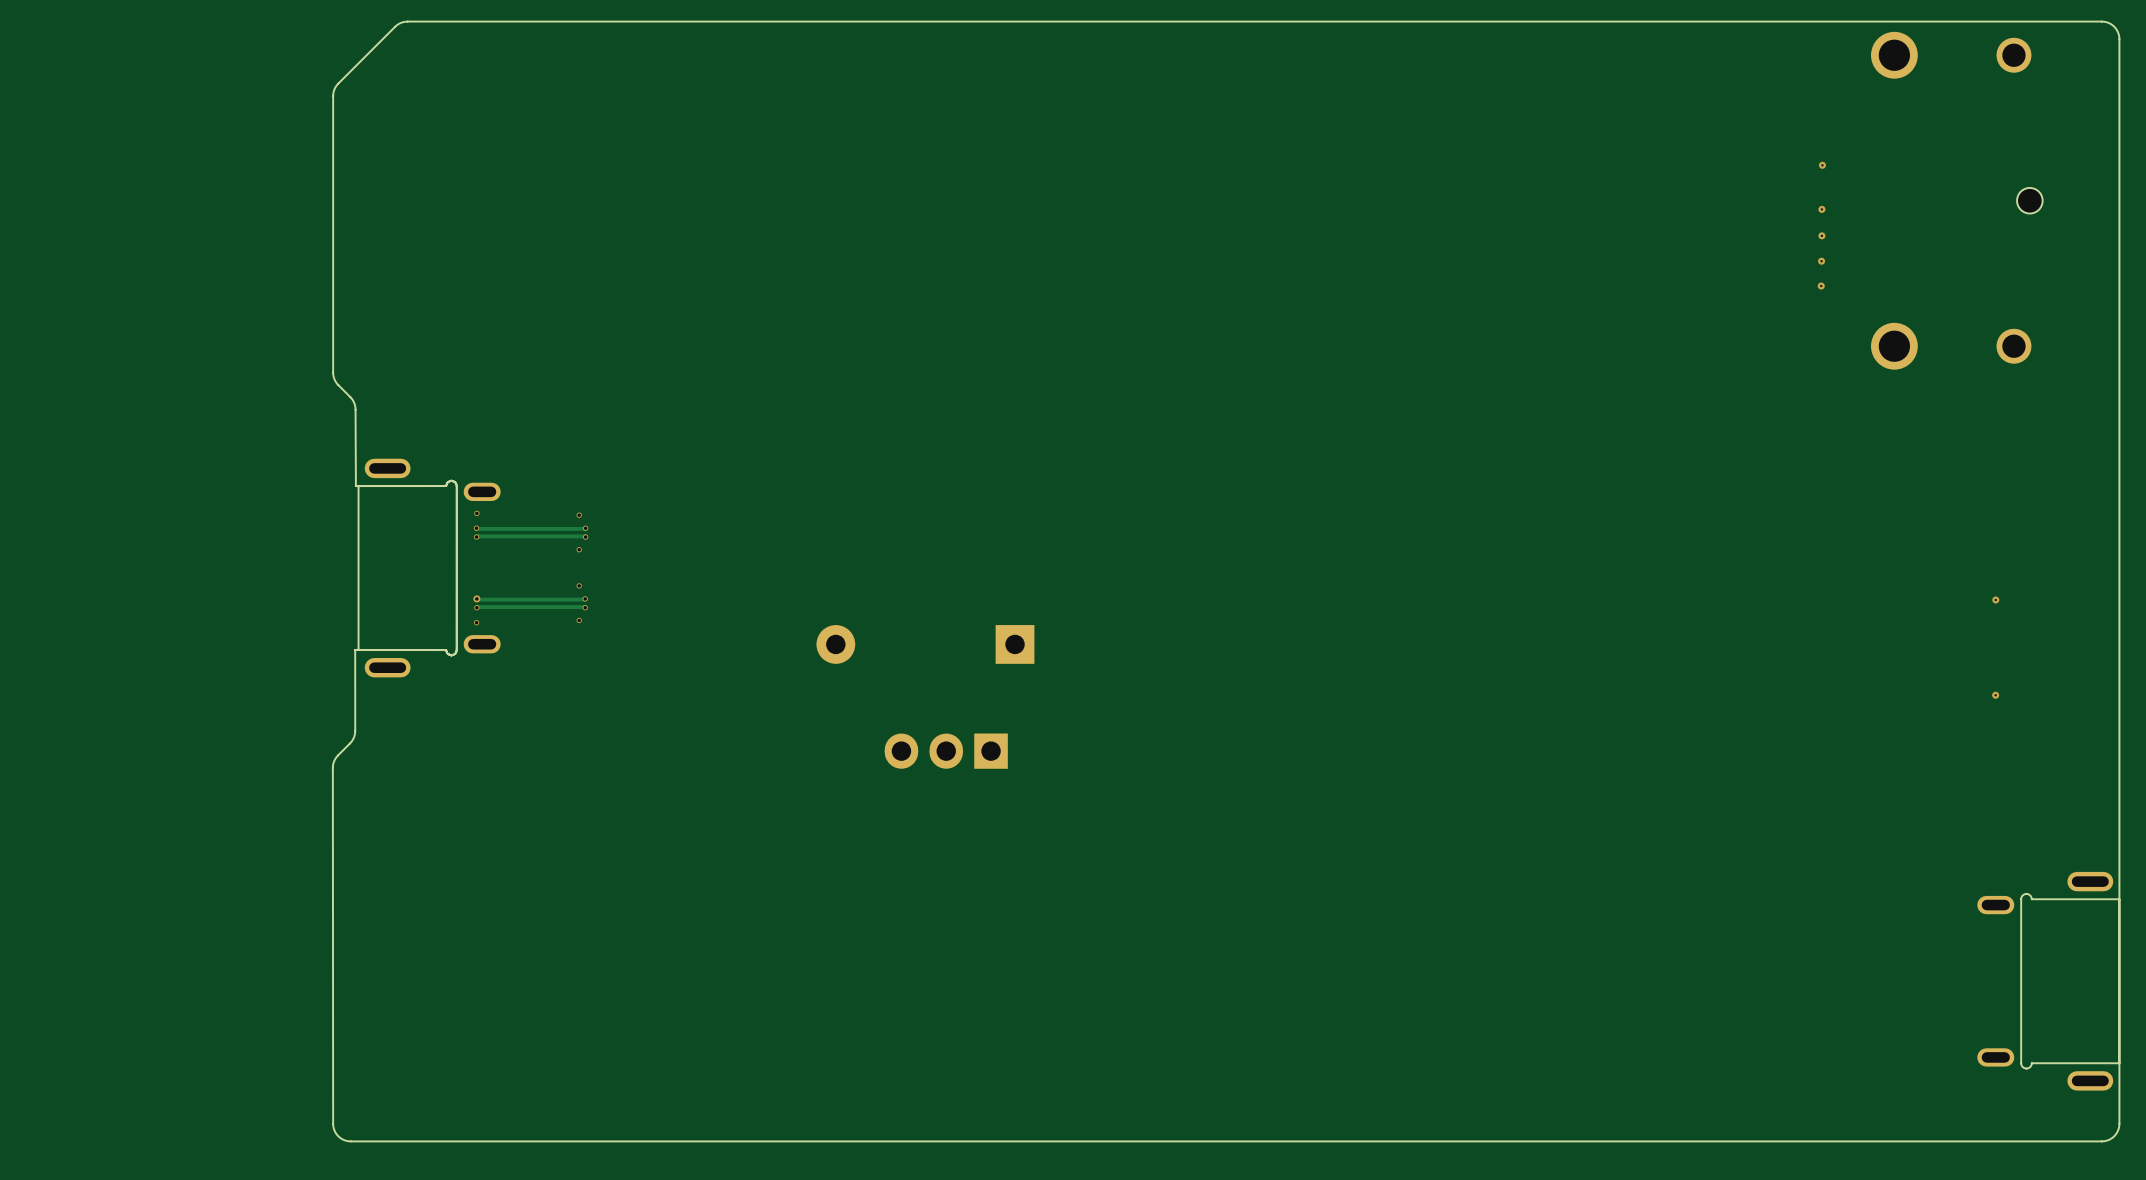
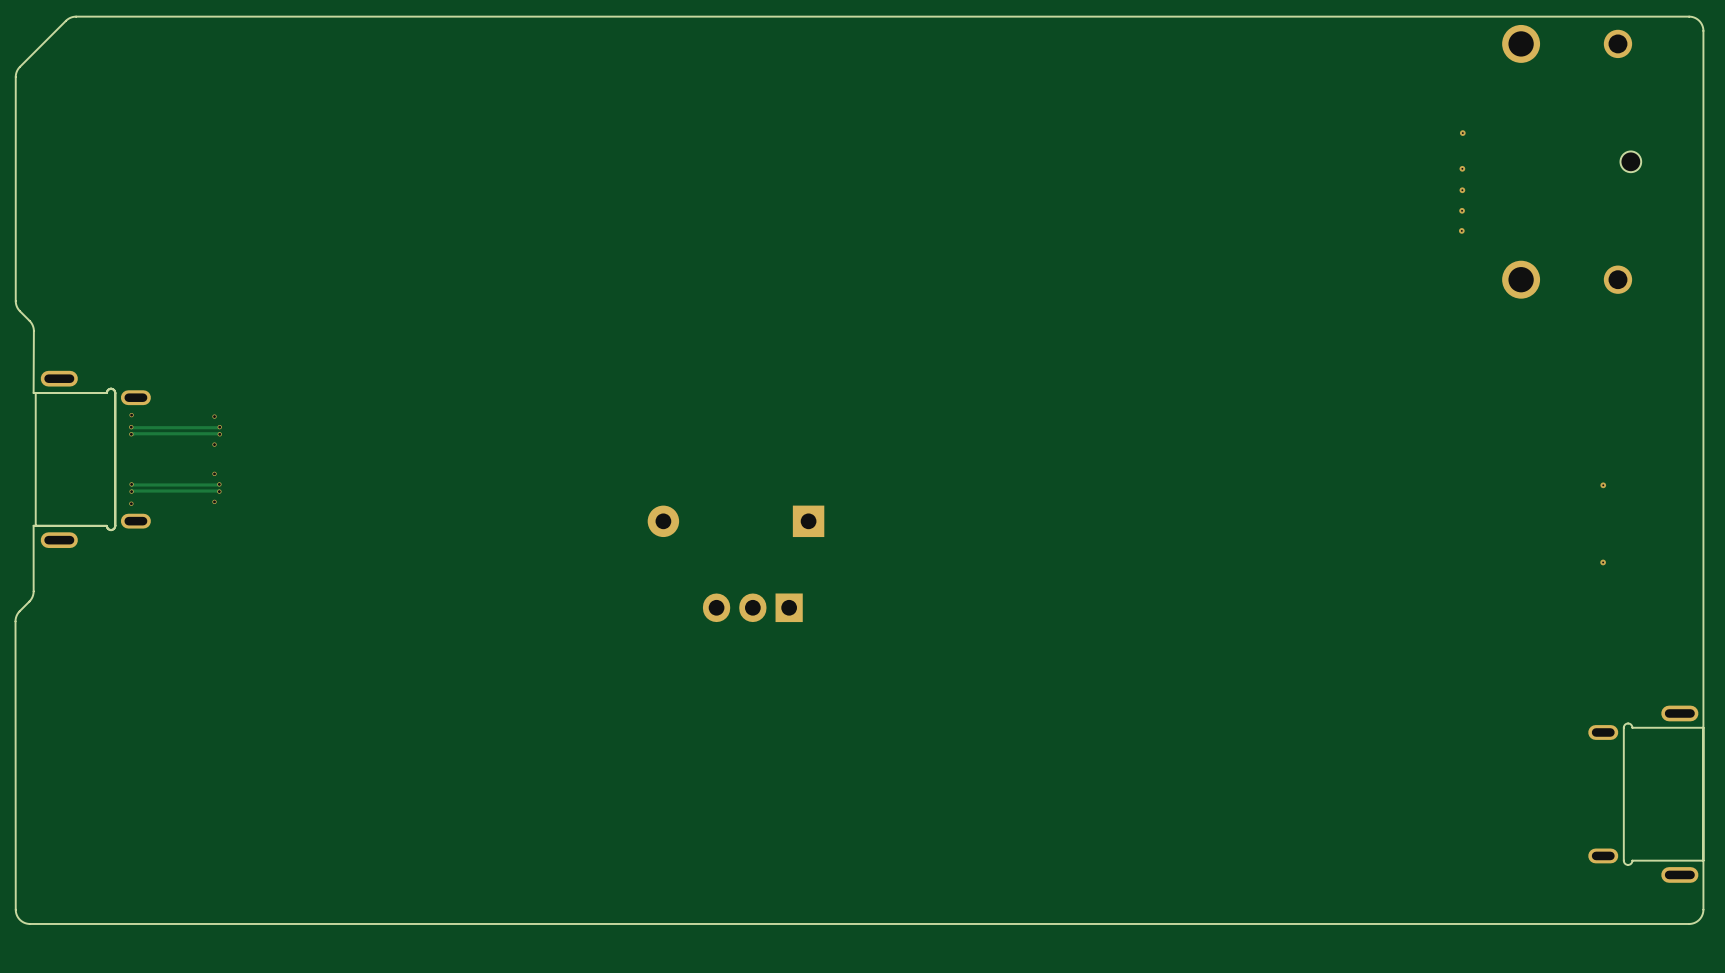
board edge: (407, 21) (395, 26) (338, 83) (333, 91) (333, 374) (336, 382) (351, 398) (355, 406) (355, 486) (446, 486) (447, 482) (451, 480) (455, 482) (456, 486) (456, 650) (455, 653) (451, 655) (447, 653) (446, 650) (355, 649) (355, 733) (351, 741) (335, 759) (332, 767) (333, 1123) (338, 1136) (350, 1141) -> (316, 16) (73, 16) (66, 20) (19, 66) (15, 76) (15, 302) (18, 309) (30, 321) (33, 328) (33, 393) (106, 392) (111, 388) (115, 392) (114, 528) (111, 530) (106, 525) (33, 525) (33, 593) (30, 600) (18, 612) (15, 619) (16, 914) (21, 920) (30, 923) (270, 923)
via: none -> (131, 415)
via: (476, 513) -> none
via: none -> (214, 416)
via: (579, 515) -> none
via: none -> (131, 427)
via: none -> (219, 427)
via: (476, 528) -> none
track: (584, 528) (476, 528) -> (219, 427) (131, 427)
via: (585, 528) -> none
track: (584, 536) (479, 536) -> (219, 433) (133, 433)
via: none -> (131, 434)
via: none -> (219, 434)
via: (476, 537) -> none
via: (585, 537) -> none
via: none -> (214, 444)
via: (579, 549) -> none
part position: (429, 568) -> (93, 459)
via: none -> (214, 473)
via: (579, 585) -> none
via: none -> (131, 484)
via: none -> (219, 484)
track: (476, 598) (584, 599) -> (131, 484) (218, 484)
via: (476, 598) -> none
via: (585, 598) -> none
via: none -> (131, 491)
via: none -> (219, 491)
via: (476, 607) -> none
track: (584, 607) (476, 607) -> (218, 491) (131, 491)
via: (585, 607) -> none
via: none -> (214, 501)
via: (579, 620) -> none
via: none -> (131, 503)
via: (476, 622) -> none

